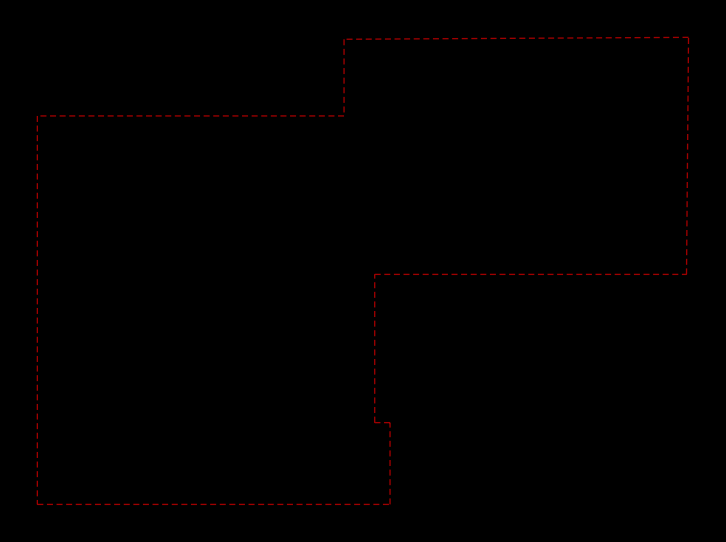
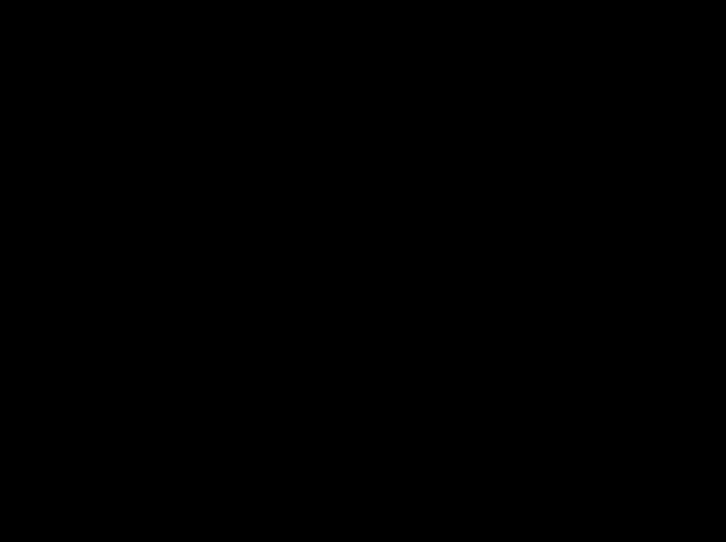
top zone outline: (688, 37) (686, 274) (374, 274) (374, 422) (390, 422) (390, 504) (37, 504) (37, 115) (344, 115) (344, 39) (688, 37) -> none

